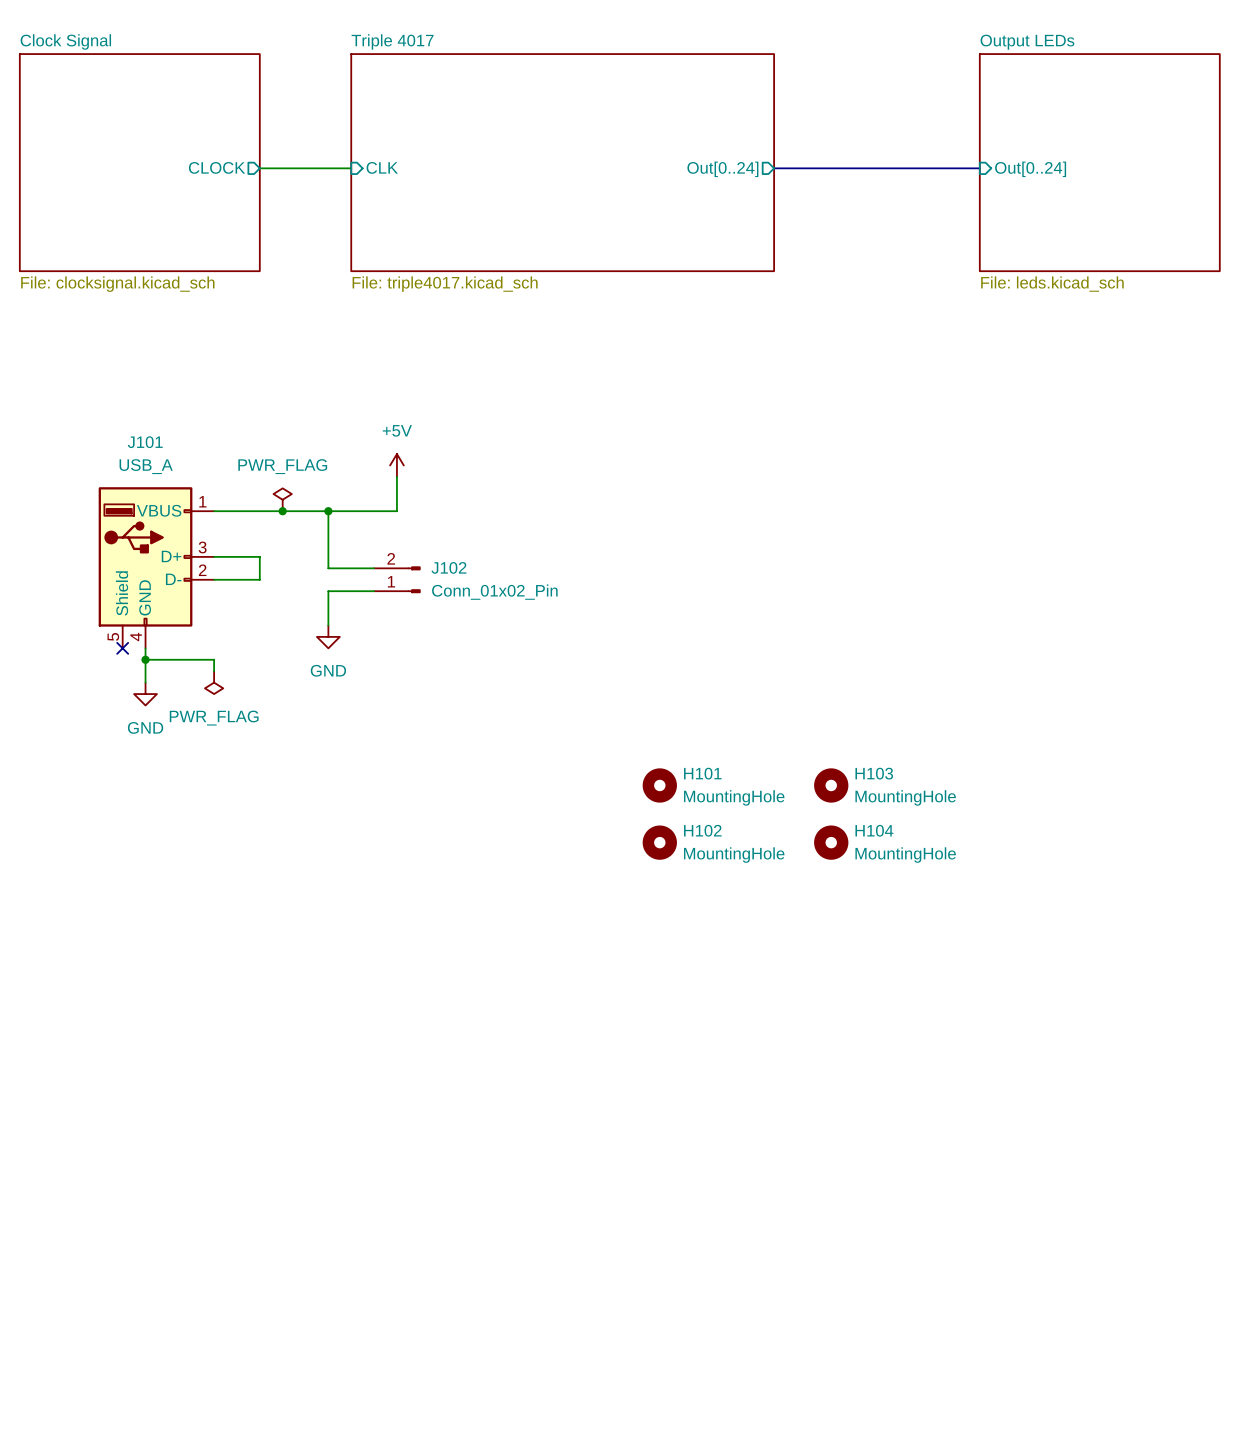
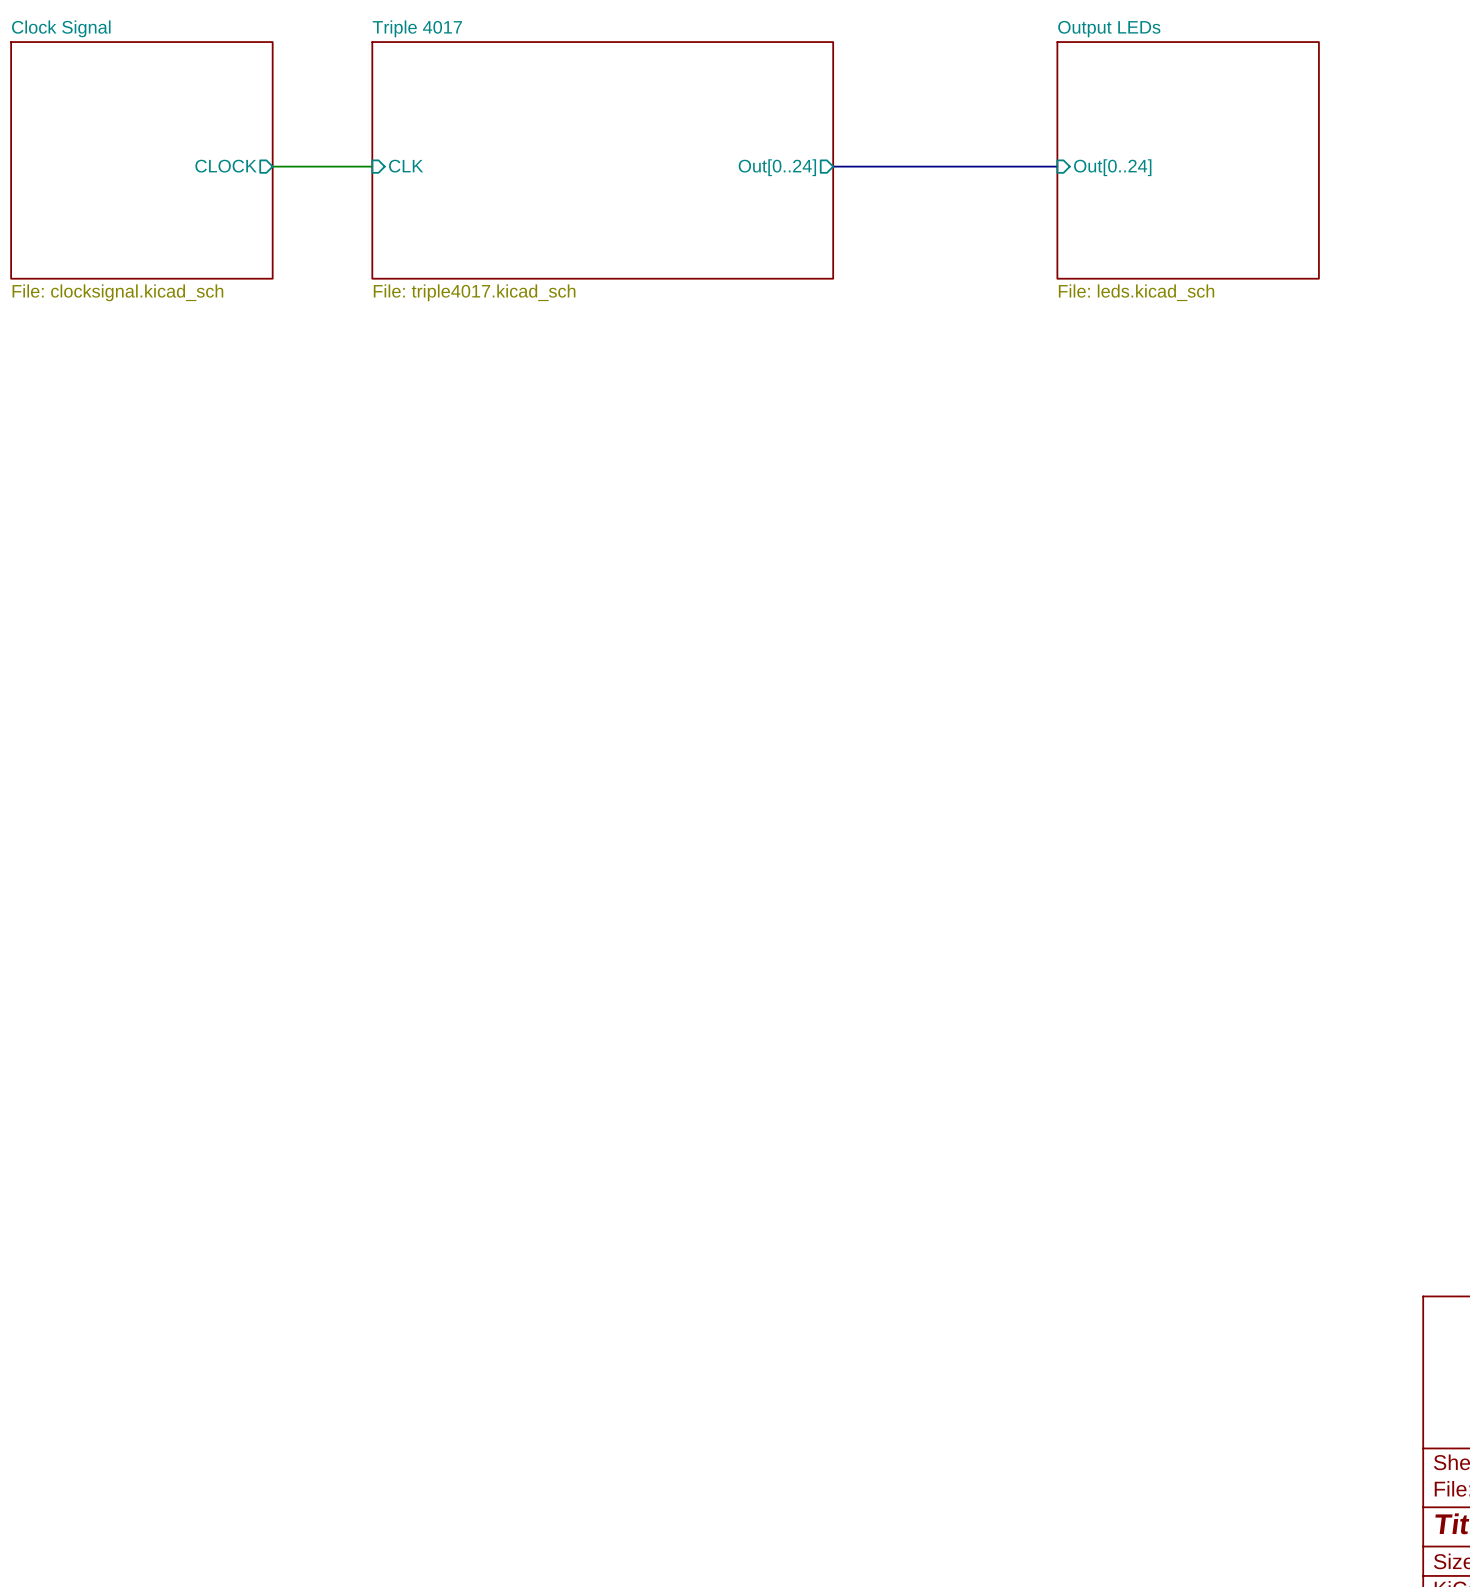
power symbol: +5V (396, 465) -> none
wire: (396, 476) (396, 511) (214, 511) -> none
power symbol: PWR_FLAG (282, 499) -> none
junction: (282, 511) -> none
wire: (328, 511) (328, 568) (374, 568) -> none
junction: (328, 511) -> none
wire: (214, 556) (259, 556) (259, 579) (214, 579) -> none
J101: USB_A (156, 567) -> none
J102: Conn_01x02_Pin (397, 579) -> none
wire: (374, 591) (328, 591) (328, 625) -> none
power symbol: GND (328, 636) -> none
no-connect mark: (122, 648) -> none
wire: (145, 648) (145, 682) -> none
wire: (145, 659) (214, 659) (214, 671) -> none
junction: (145, 659) -> none
power symbol: PWR_FLAG (214, 682) -> none
power symbol: GND (145, 694) -> none
H101: MountingHole (659, 785) -> none
H103: MountingHole (831, 785) -> none
H102: MountingHole (659, 842) -> none
H104: MountingHole (831, 842) -> none

